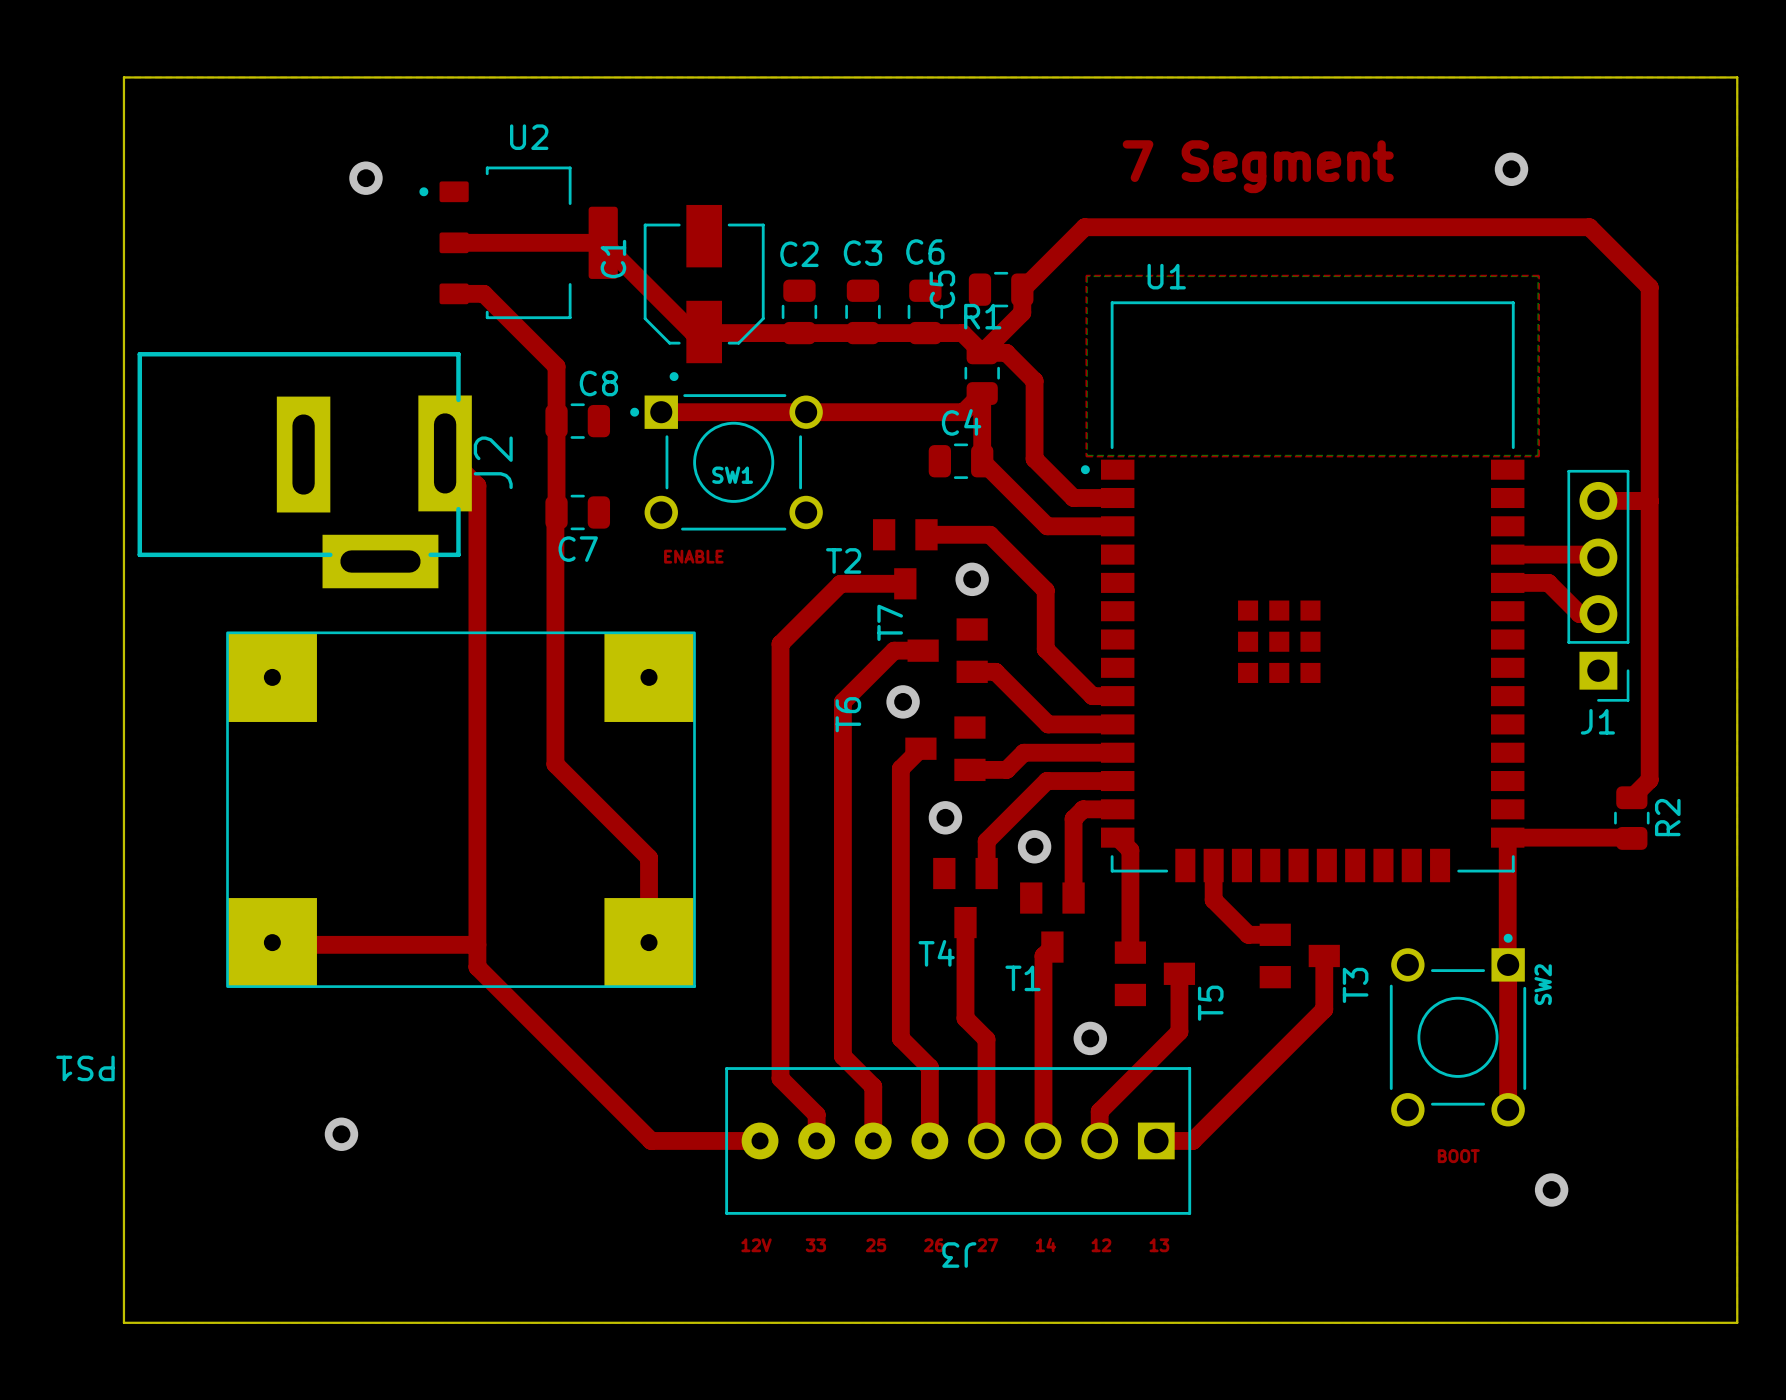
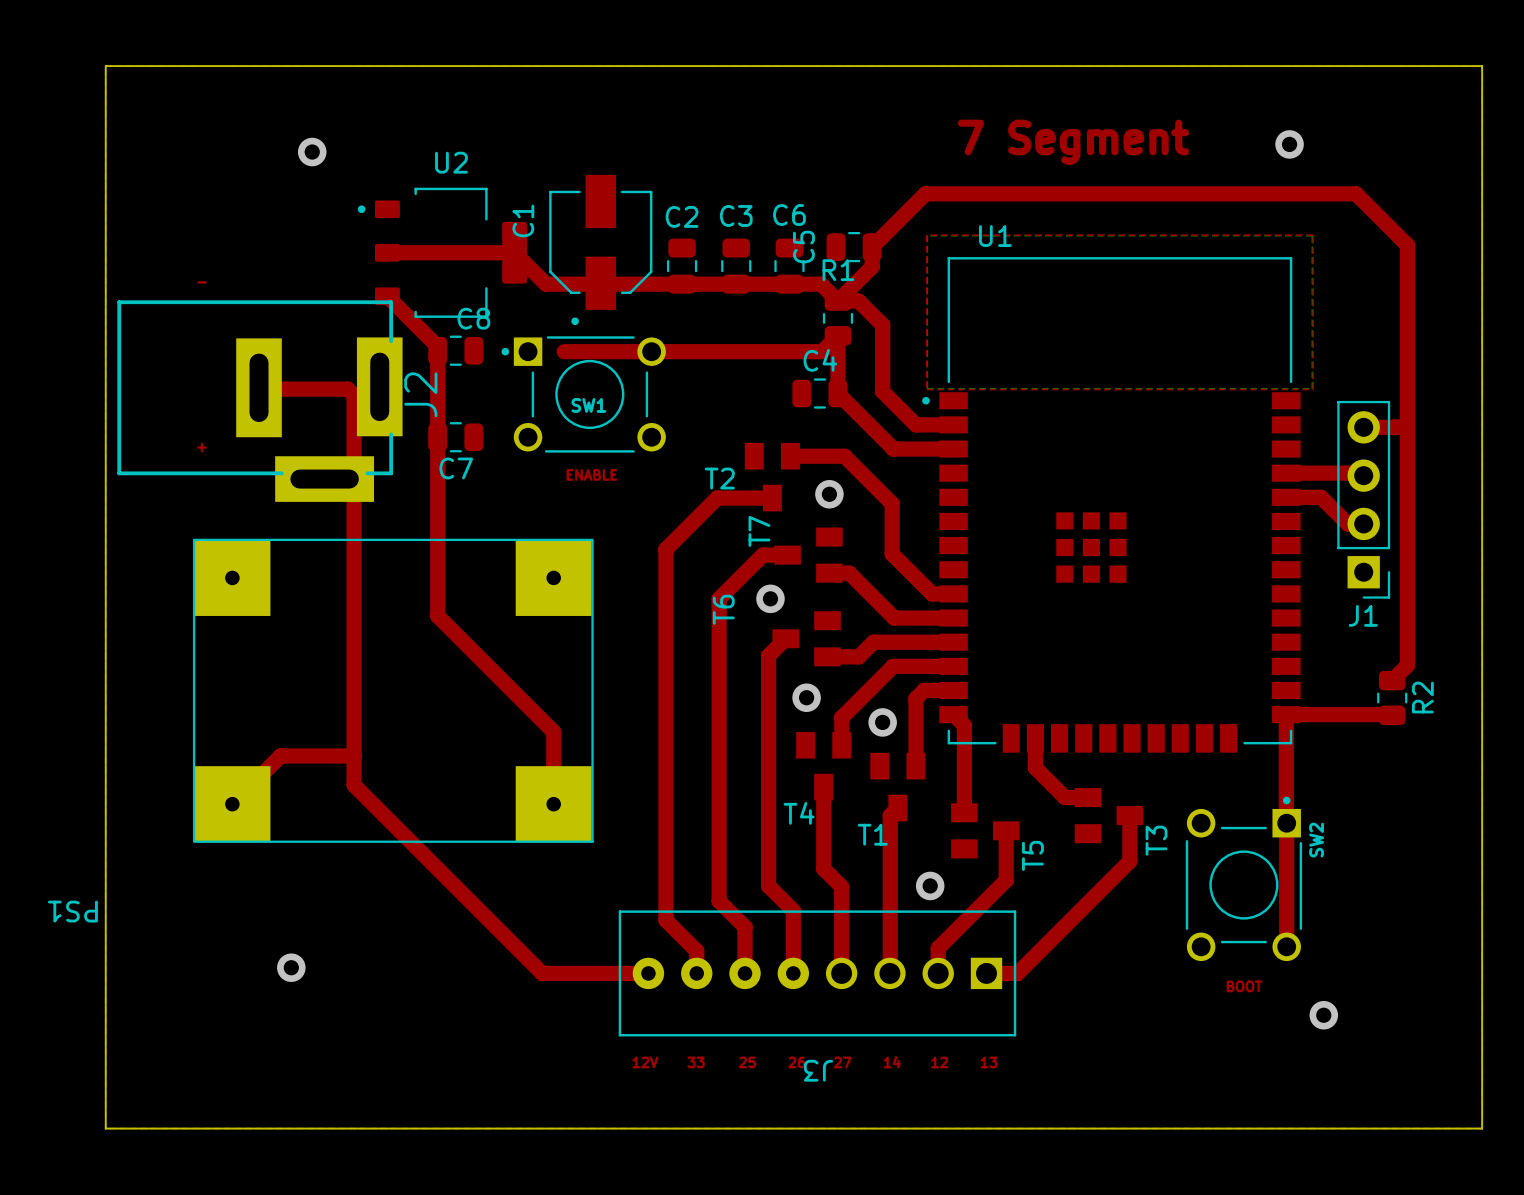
top track: (454, 242) (603, 242) (693, 333) -> (387, 252) (514, 252) (546, 284) (591, 284)
U2 position: (518, 242) -> (442, 252)
top track: (454, 293) (483, 293) (556, 366) (555, 764) -> (387, 296) (437, 346) (437, 615) (473, 652)
text: none -> - (201, 282)
C8 position: (577, 421) -> (455, 350)
top track: (445, 453) (477, 485) (477, 967) (651, 1140) -> none
top track: none -> (251, 389) (347, 389) (354, 395) (354, 754)
SW1 position: (726, 462) -> (583, 394)
C7 position: (577, 512) -> (455, 437)
text: none -> + (201, 447)
top track: (272, 942) (274, 944) (477, 944) -> (232, 804) (280, 755) (354, 755) (354, 785) (542, 973) (555, 973)

